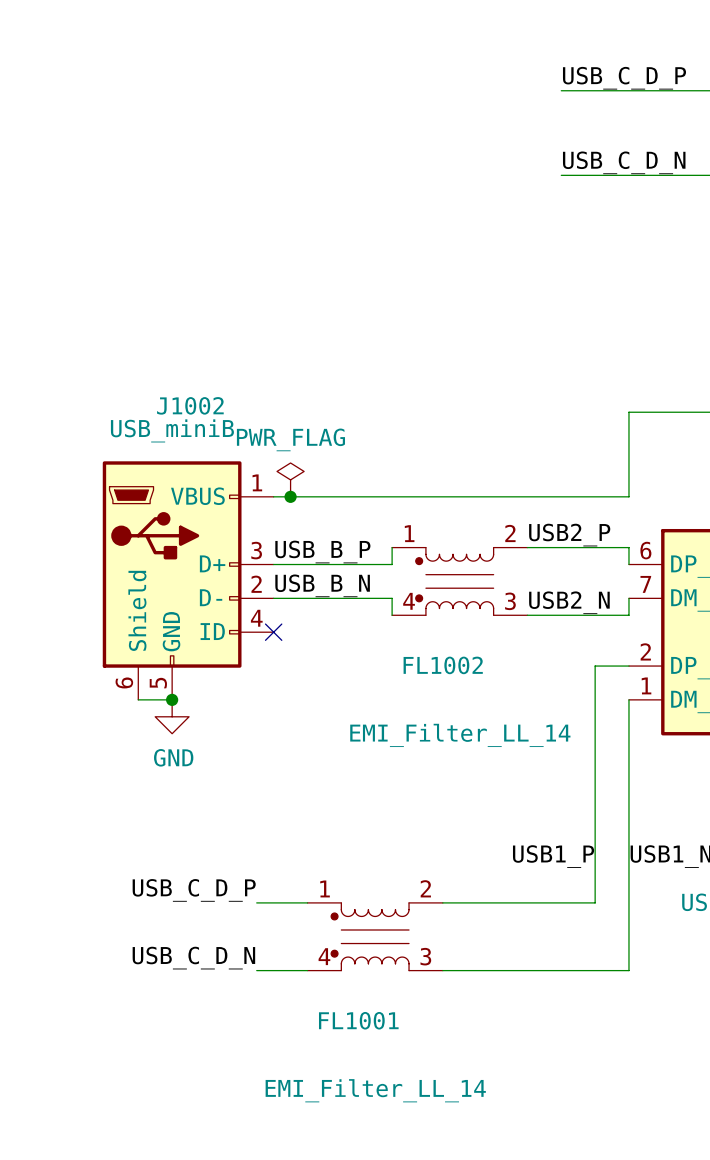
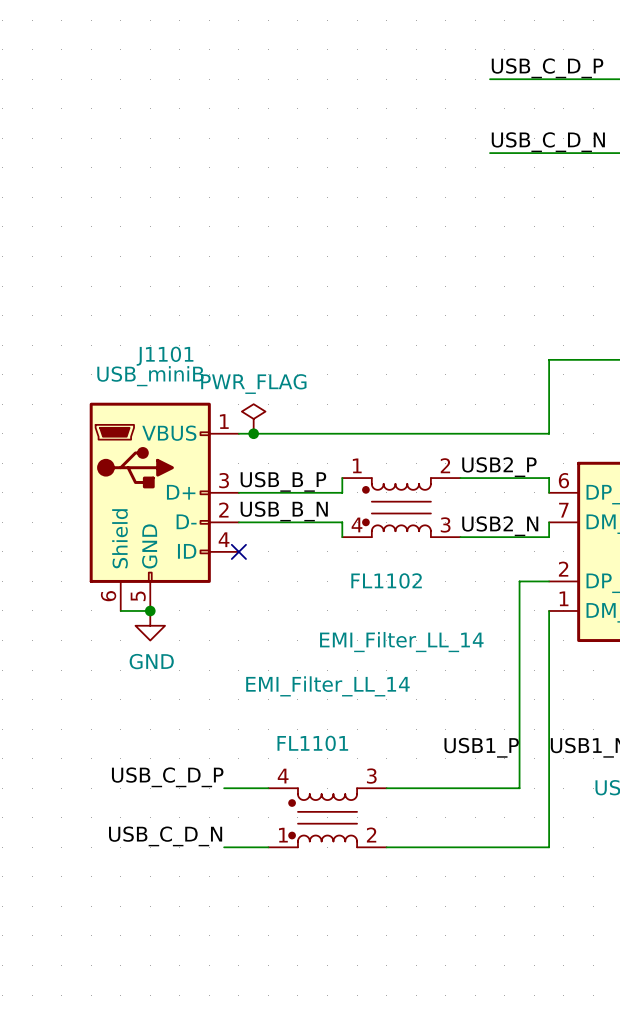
J1002 name: J1002 (190, 405) -> J1101 (165, 356)
FL1002 name: FL1002 (443, 665) -> FL1102 (386, 580)
FL1001: EMI_Filter_LL_14 (375, 936) -> none
FL1101: none -> EMI_Filter_LL_14 (327, 817)

